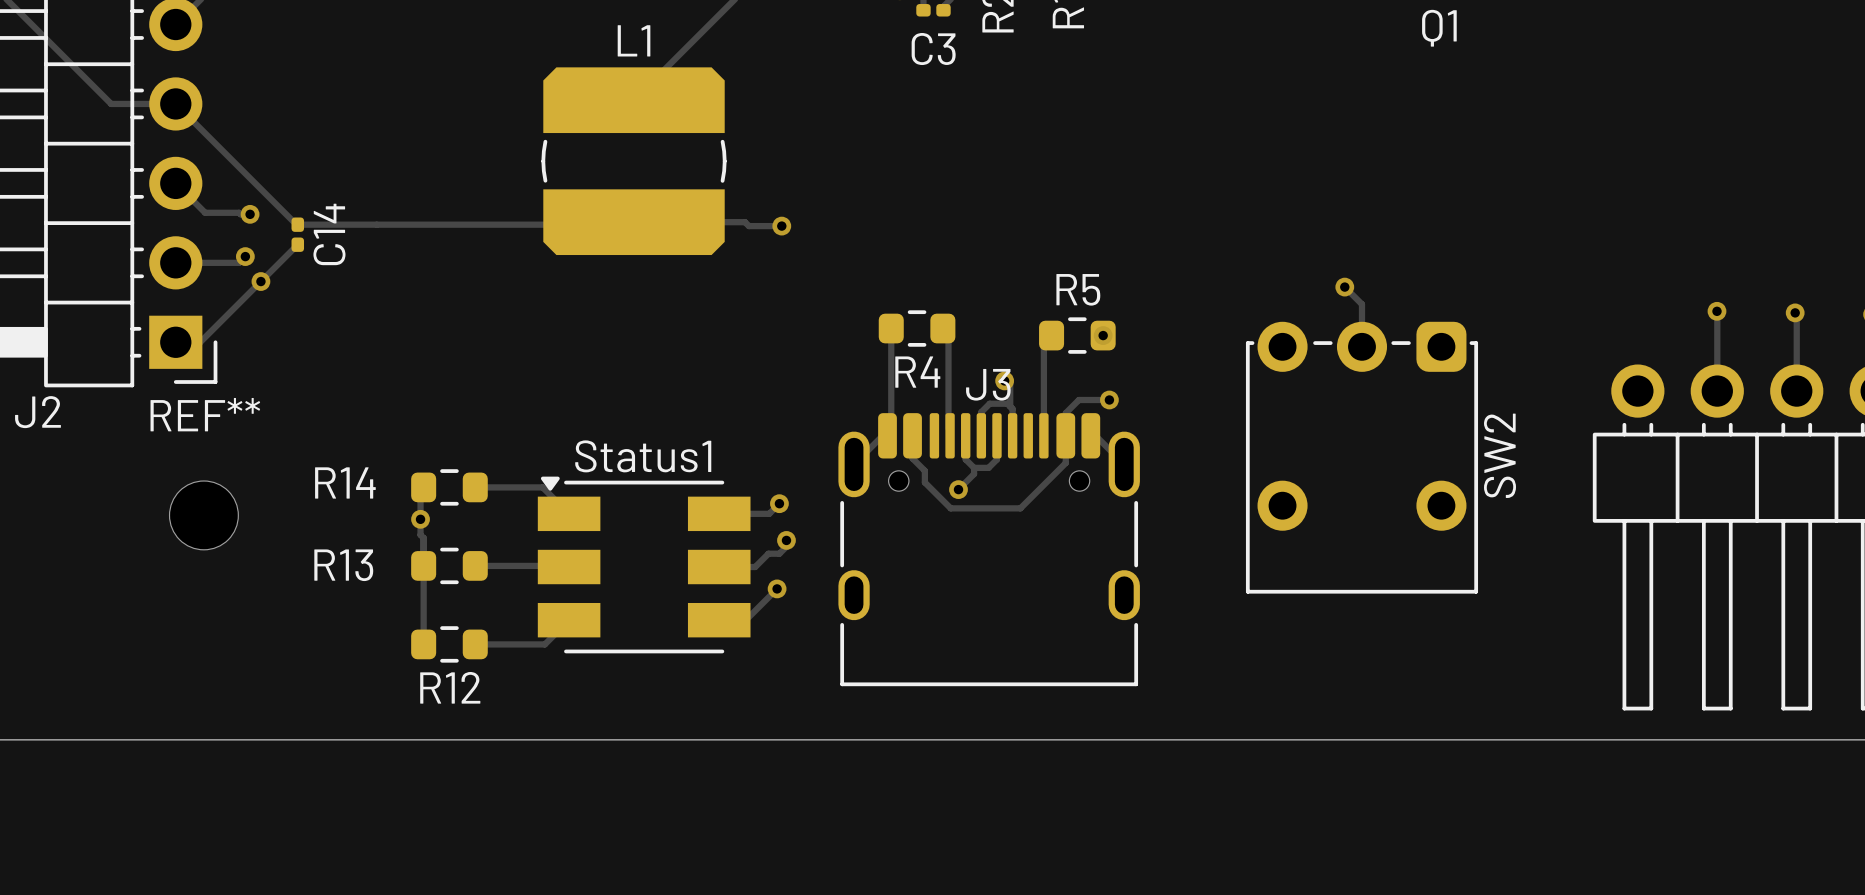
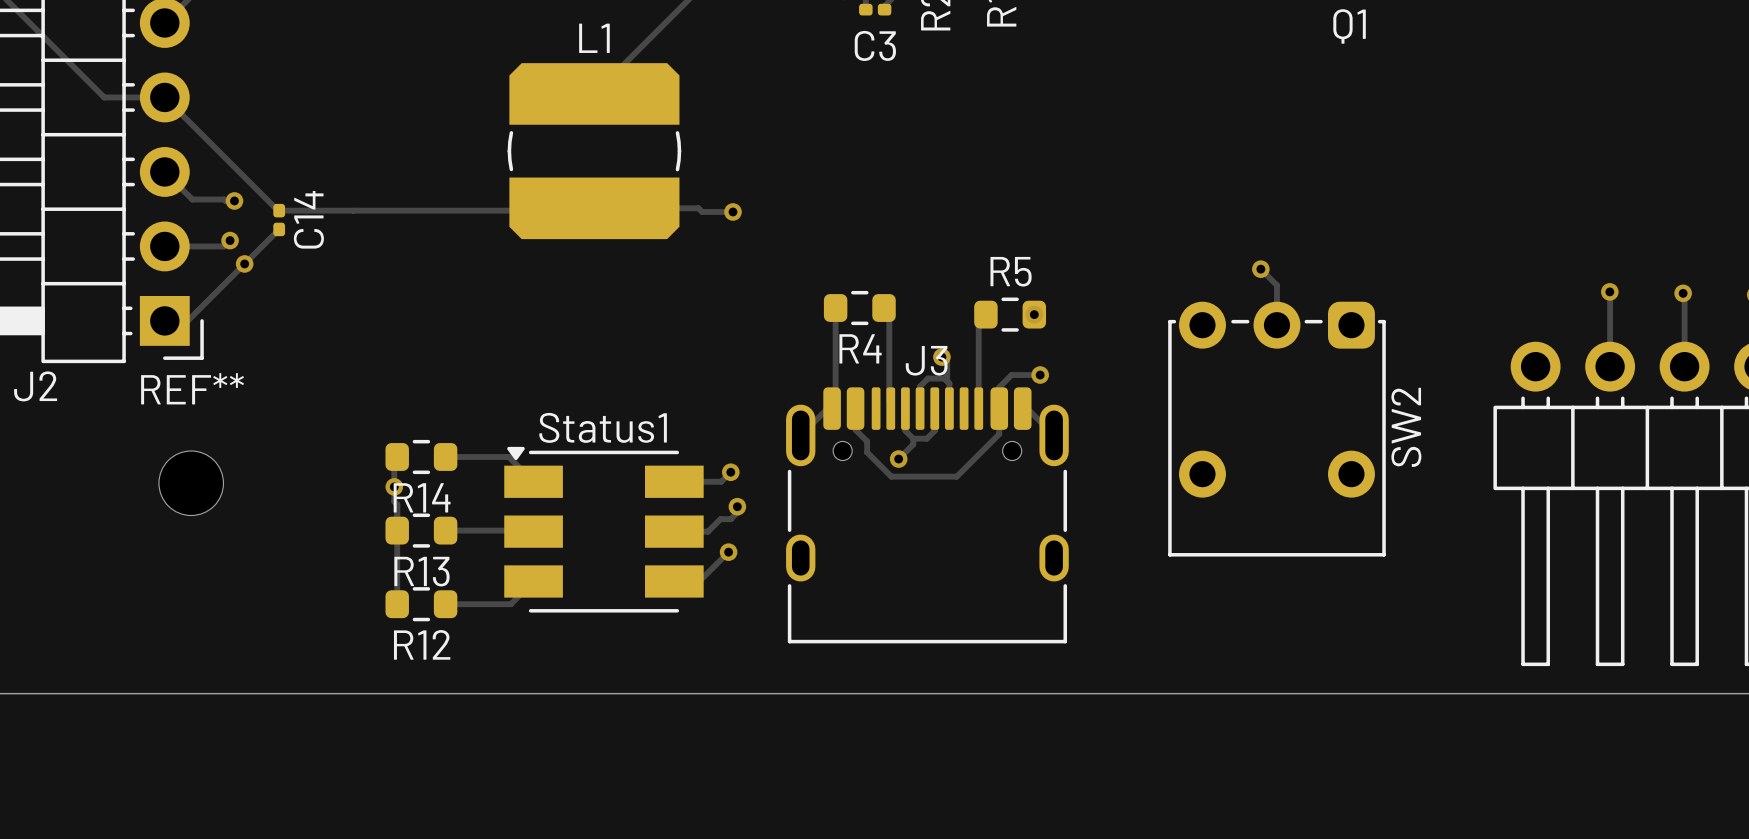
R14 name position: R14 (345, 482) -> R14 (422, 497)
R13 name position: R13 (343, 565) -> R13 (422, 571)

